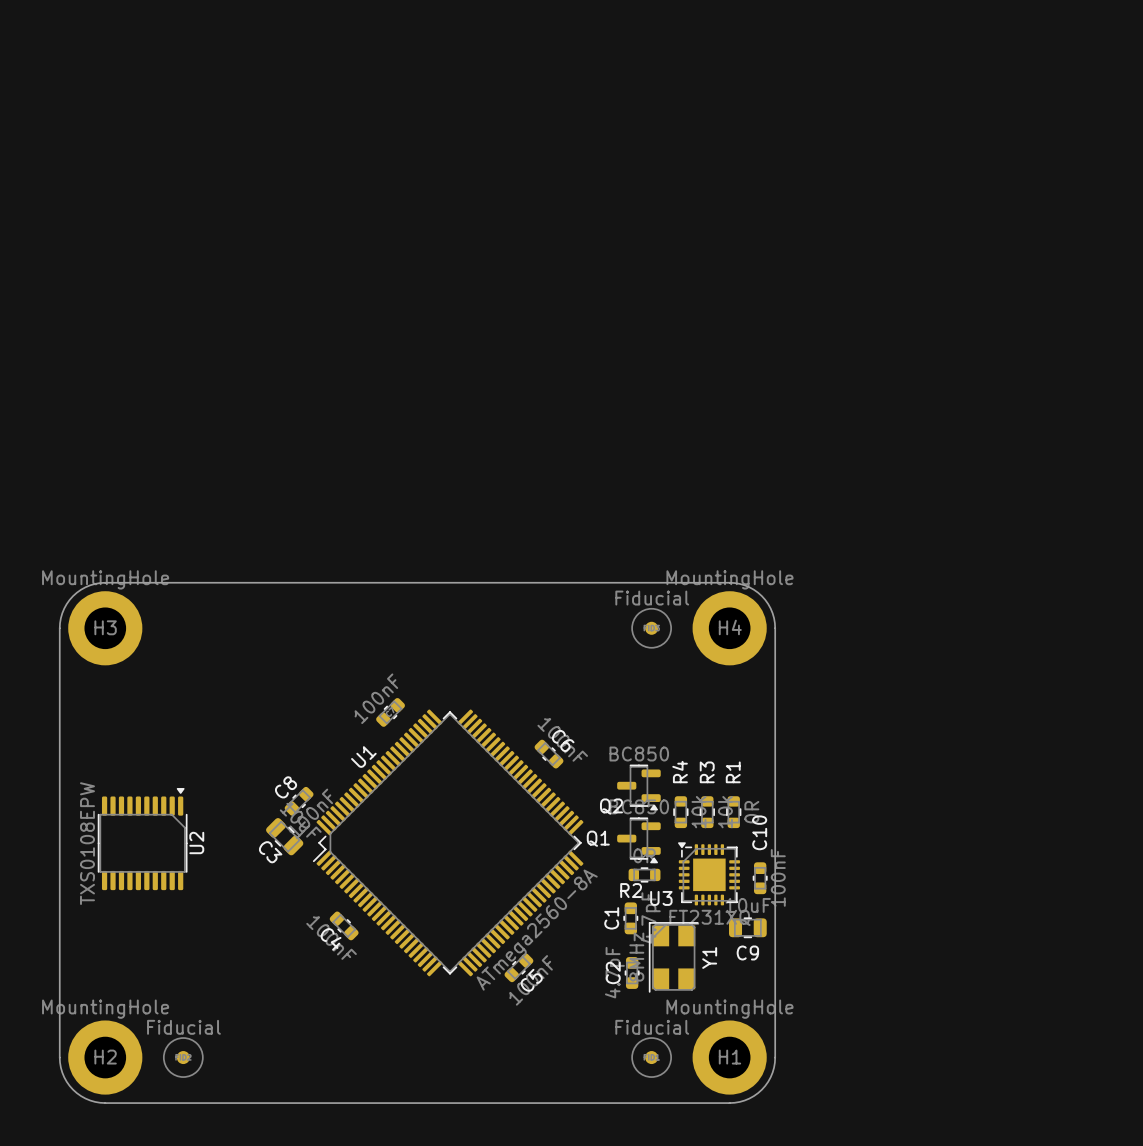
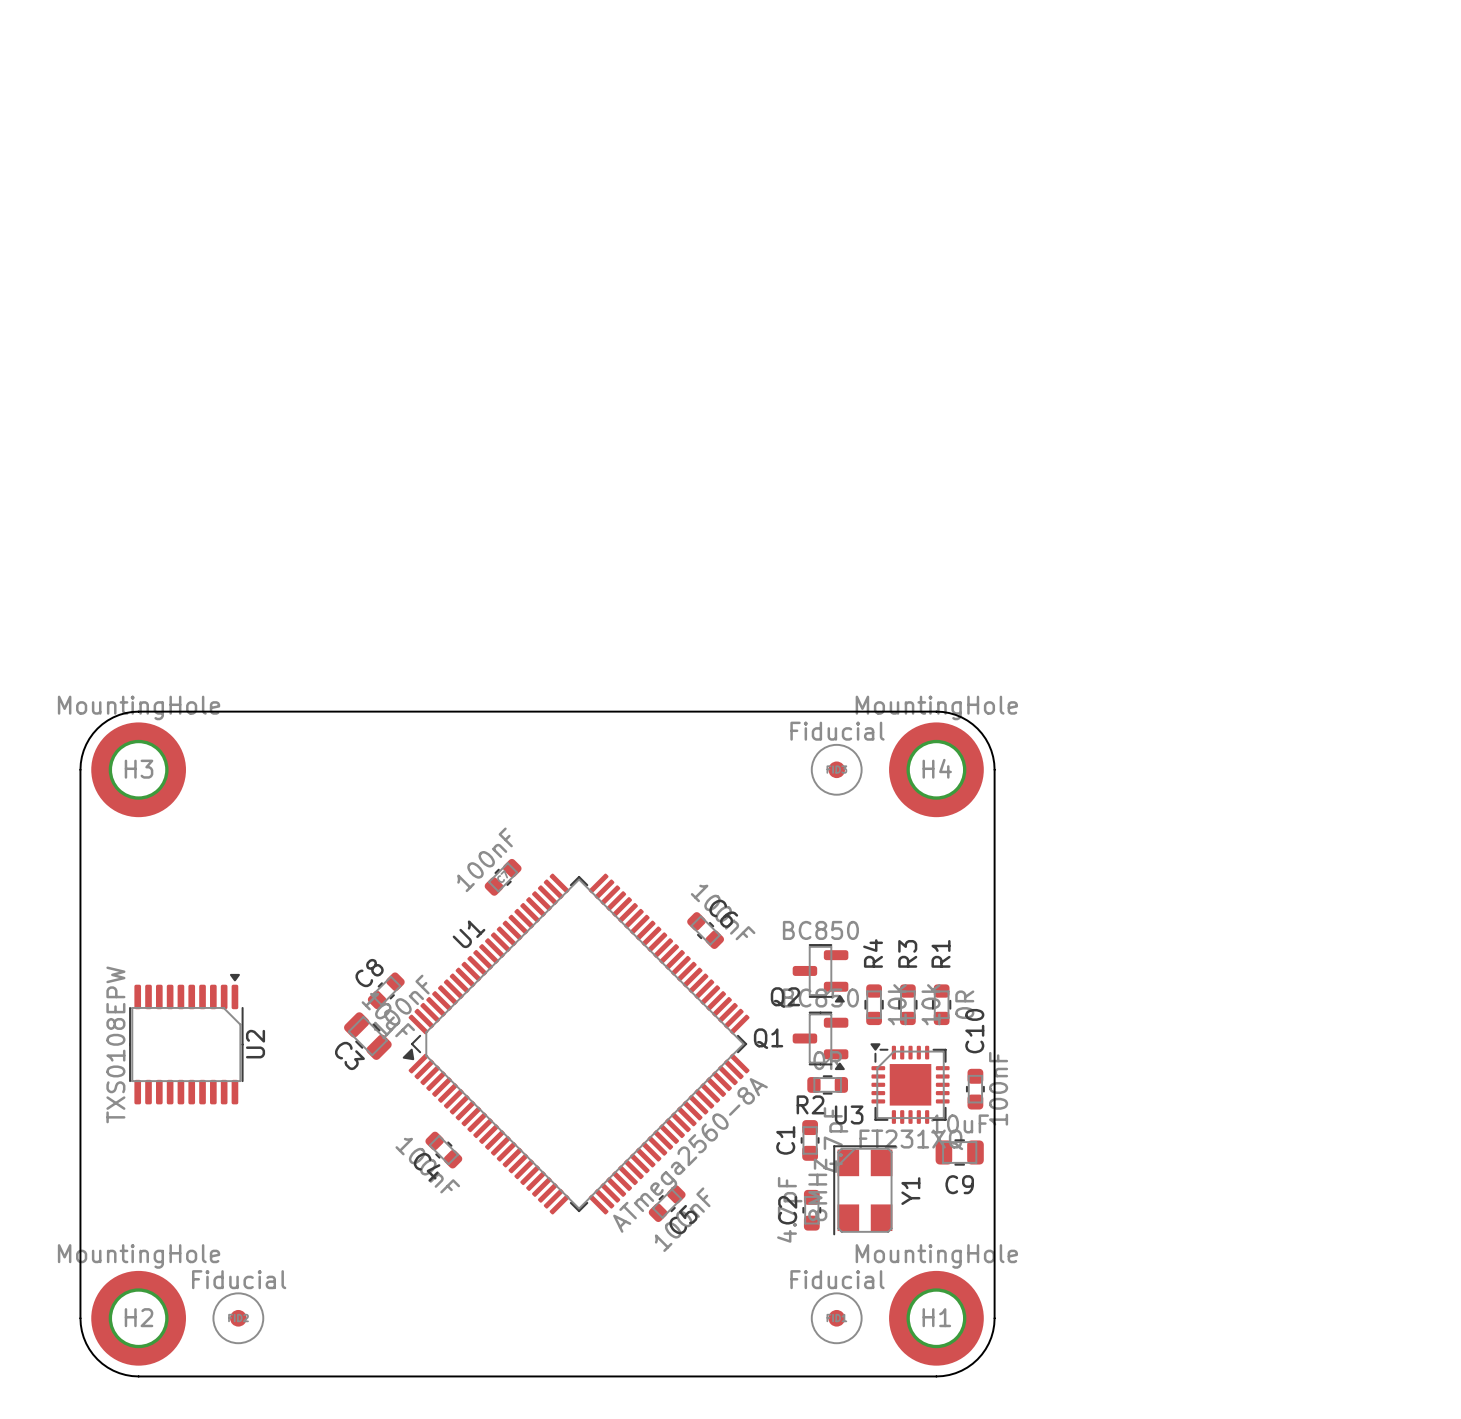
U1 footprint: [312, 709, 584, 977] -> [402, 873, 750, 1215]

